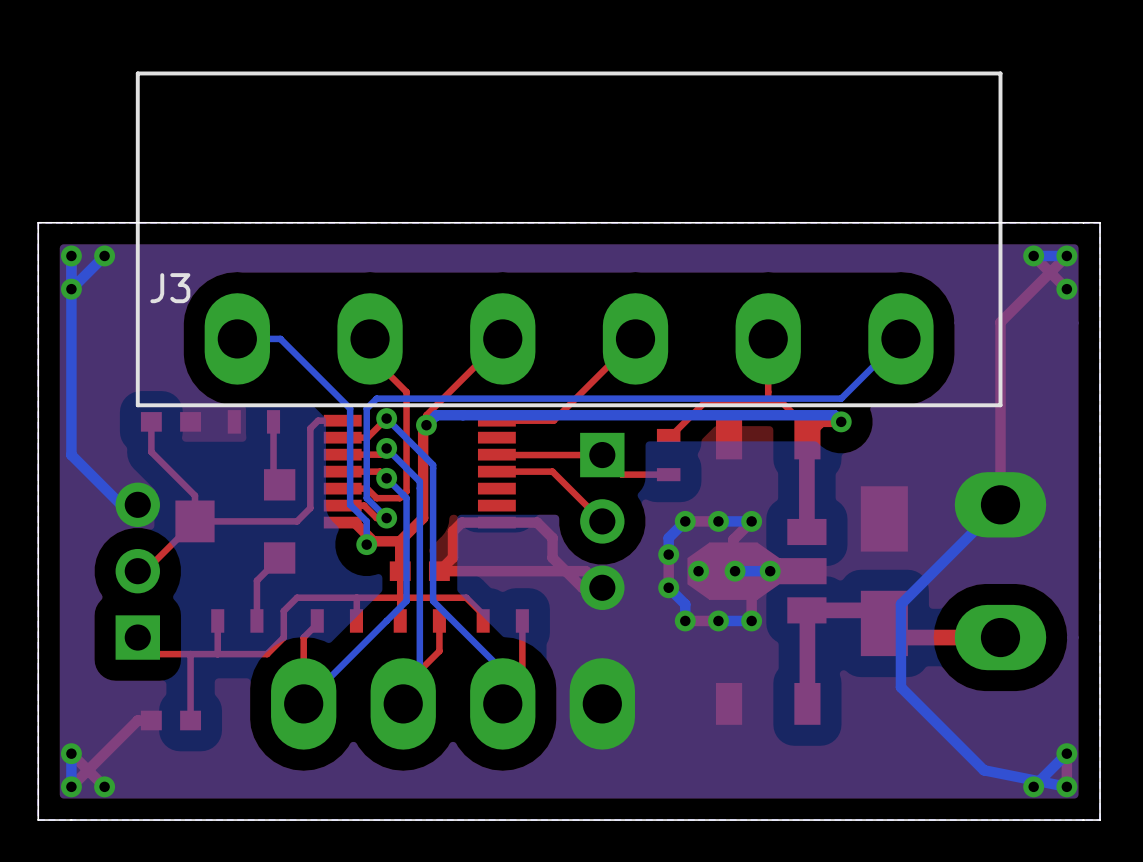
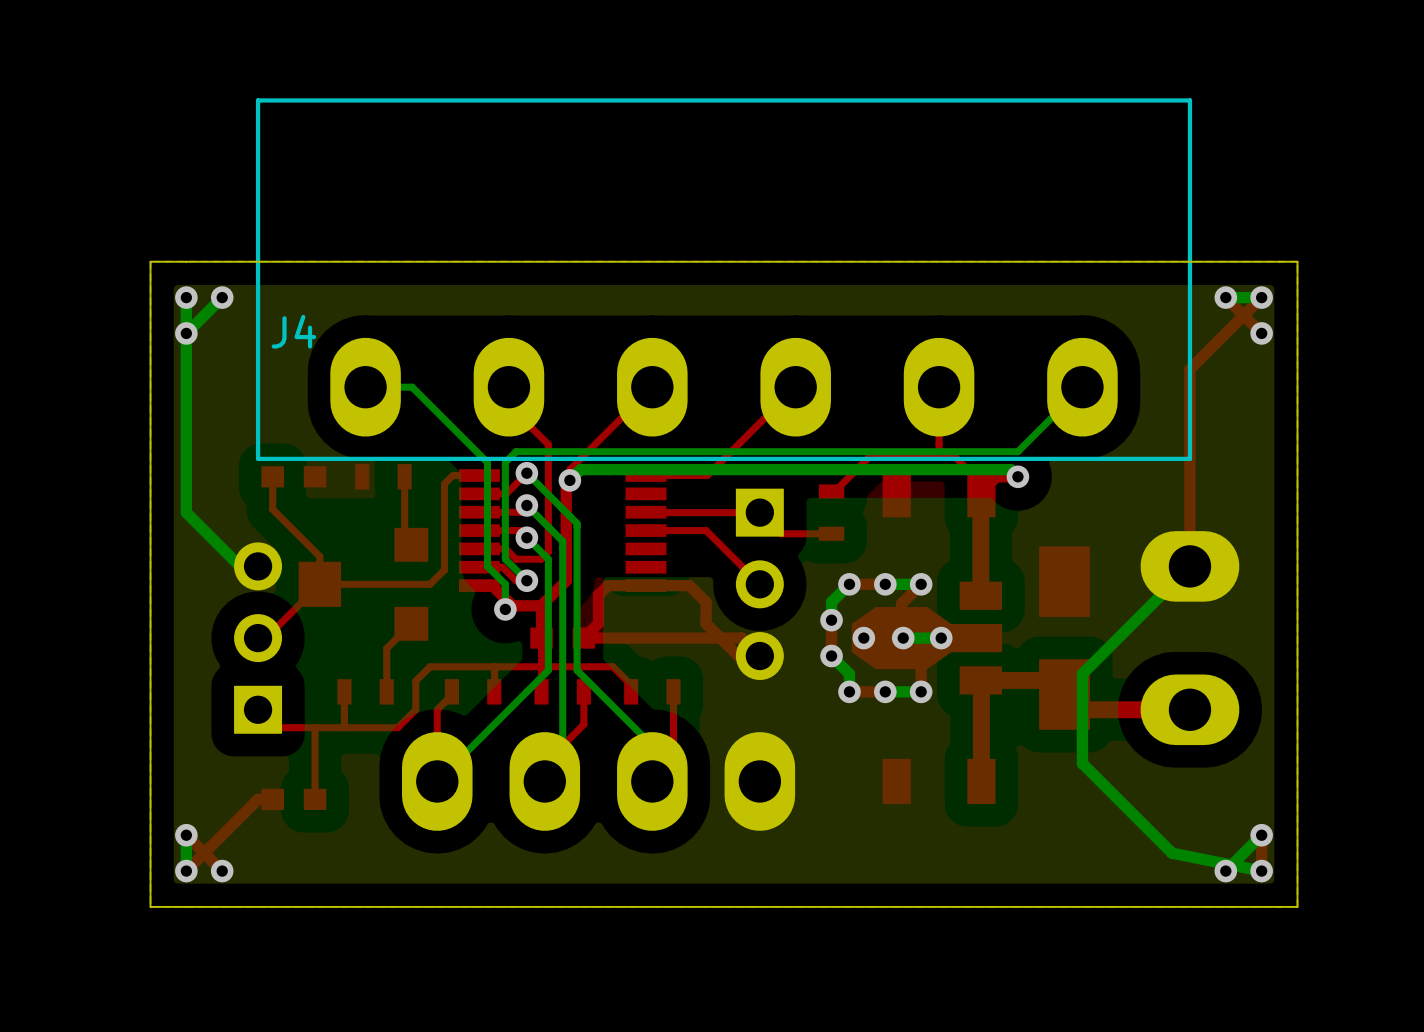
J3 name: J3 (170, 288) -> J4 (293, 331)

